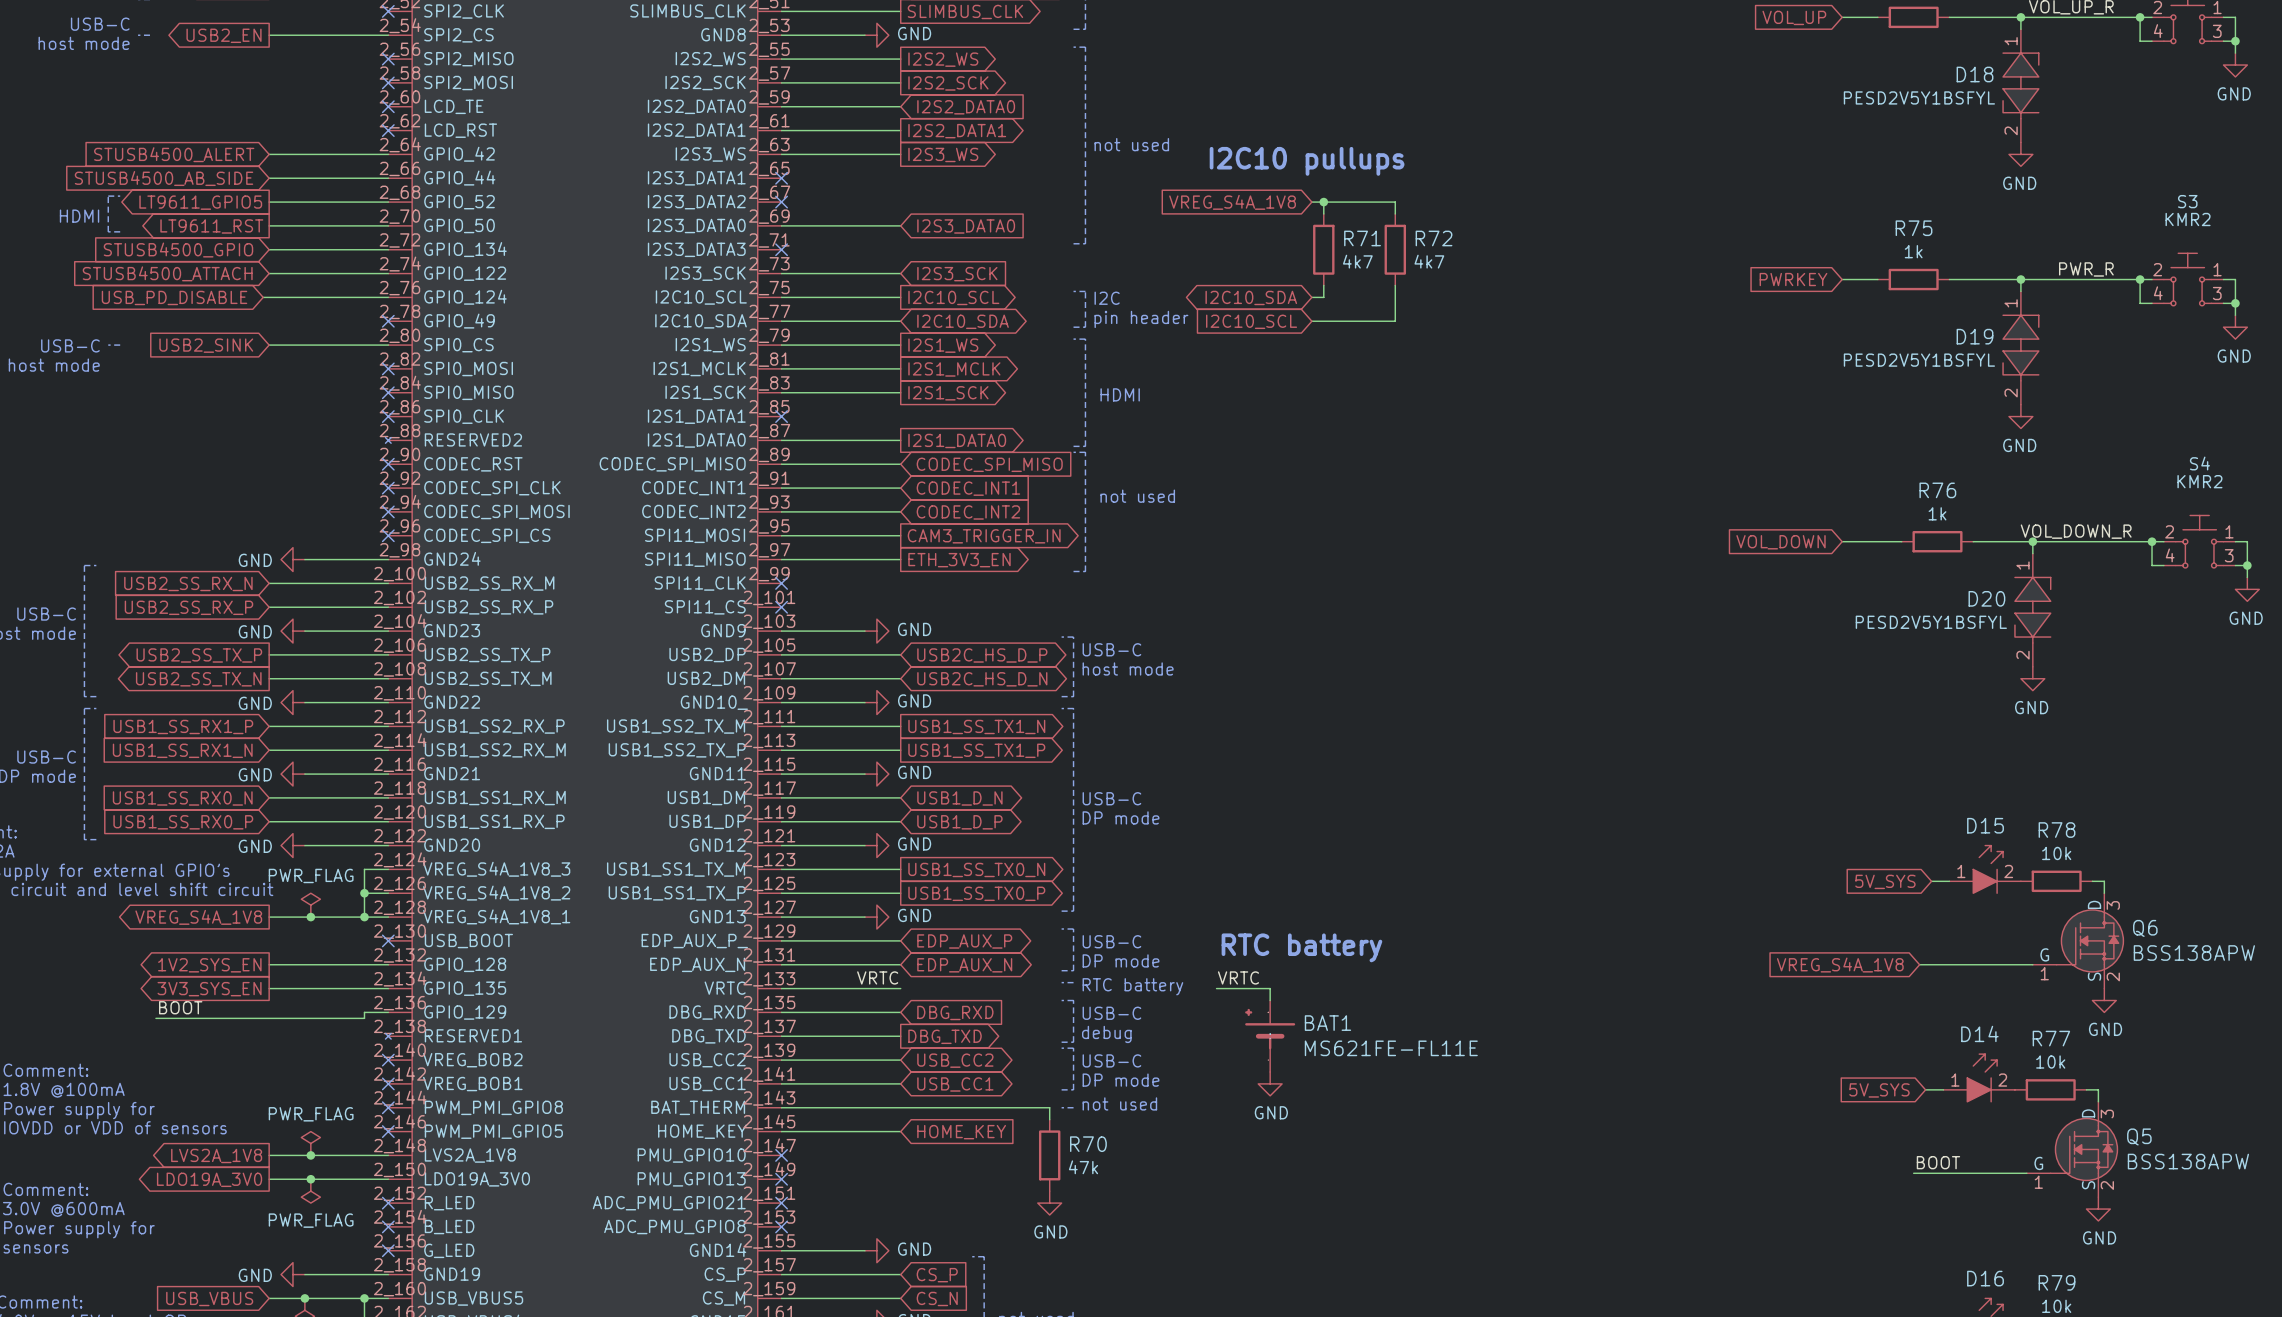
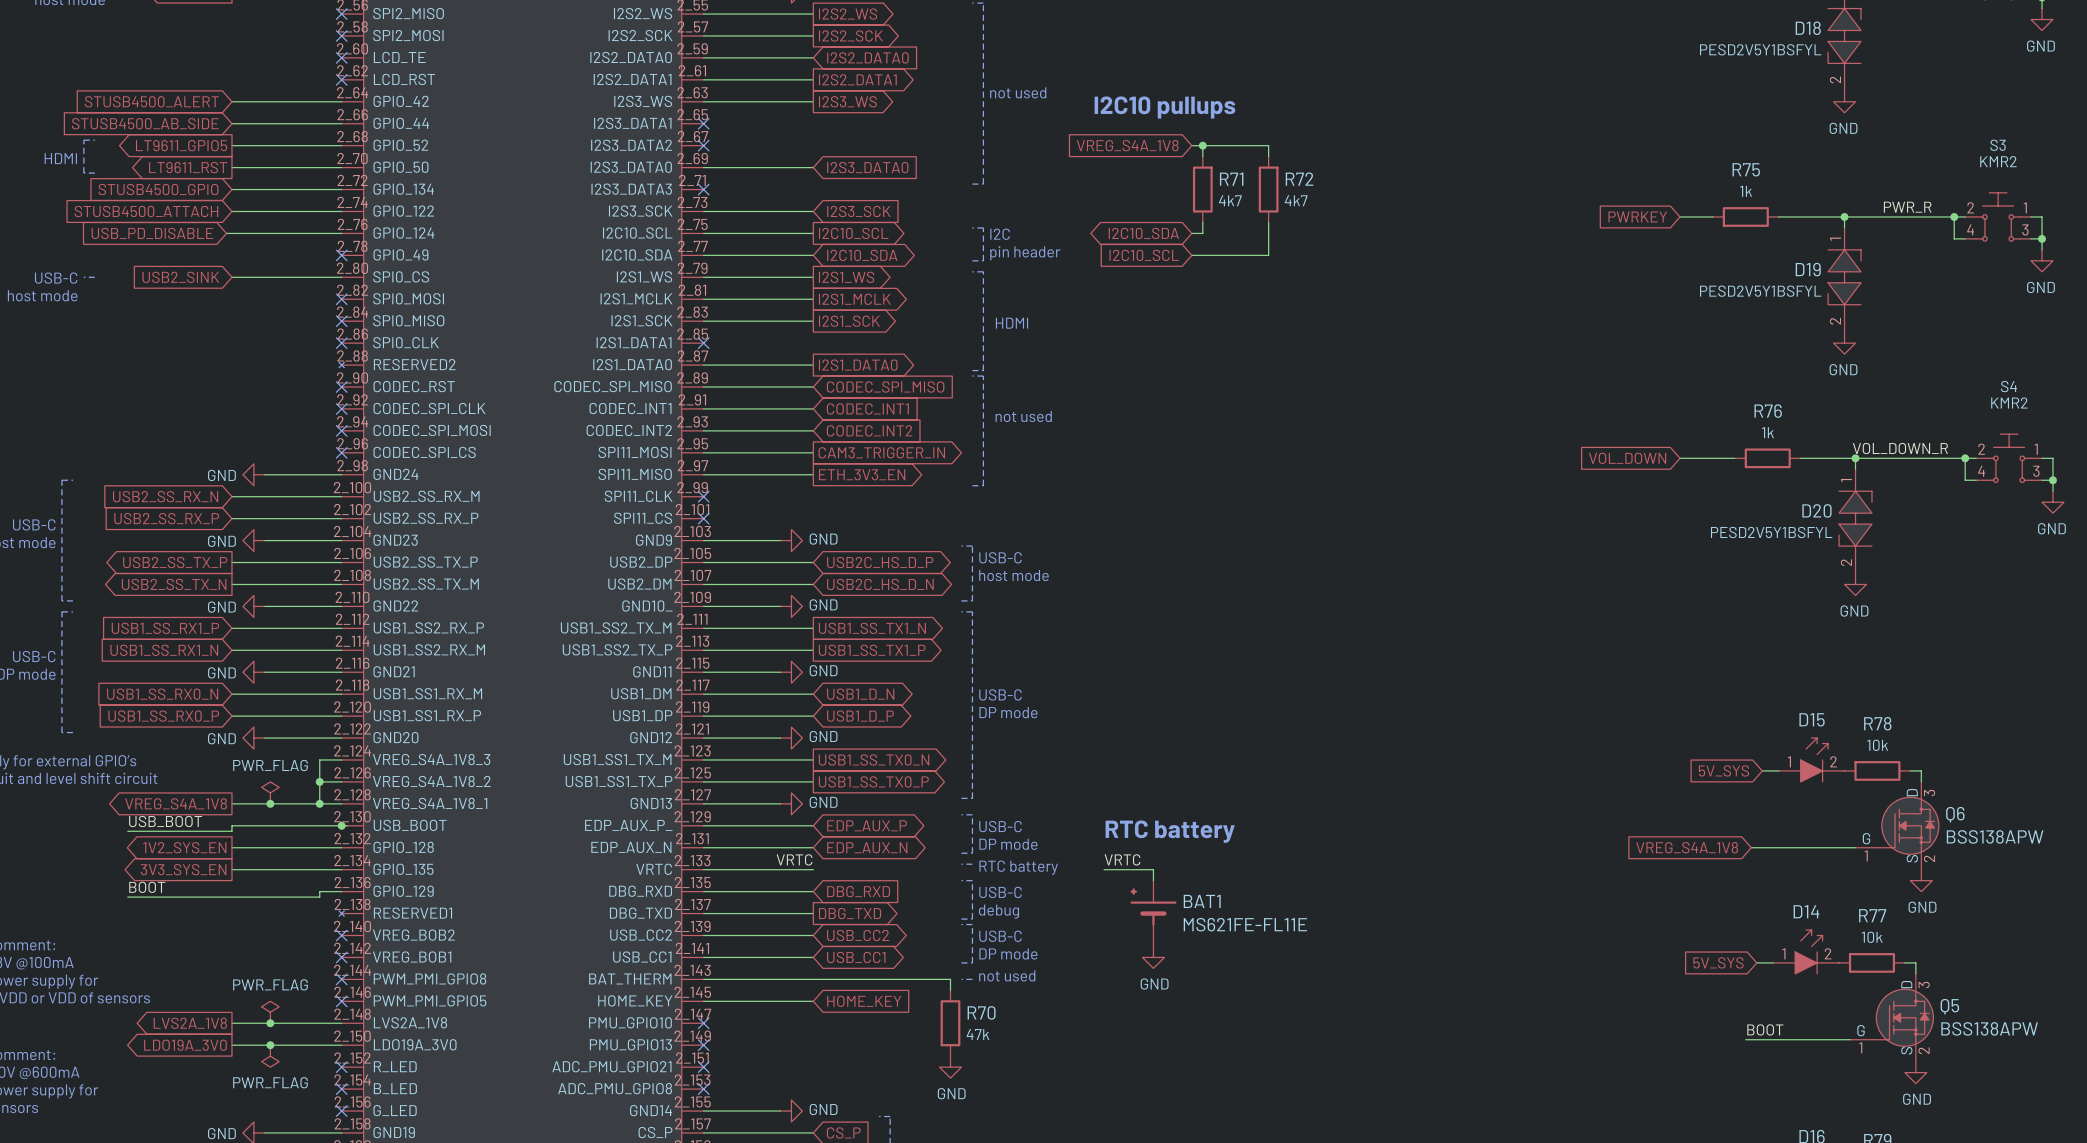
label: none -> USB_BOOT (165, 821)
no-connect mark: (388, 940) -> none
junction: none -> (341, 825)
wire: none -> (347, 825) (231, 825) (231, 831) (127, 831)

